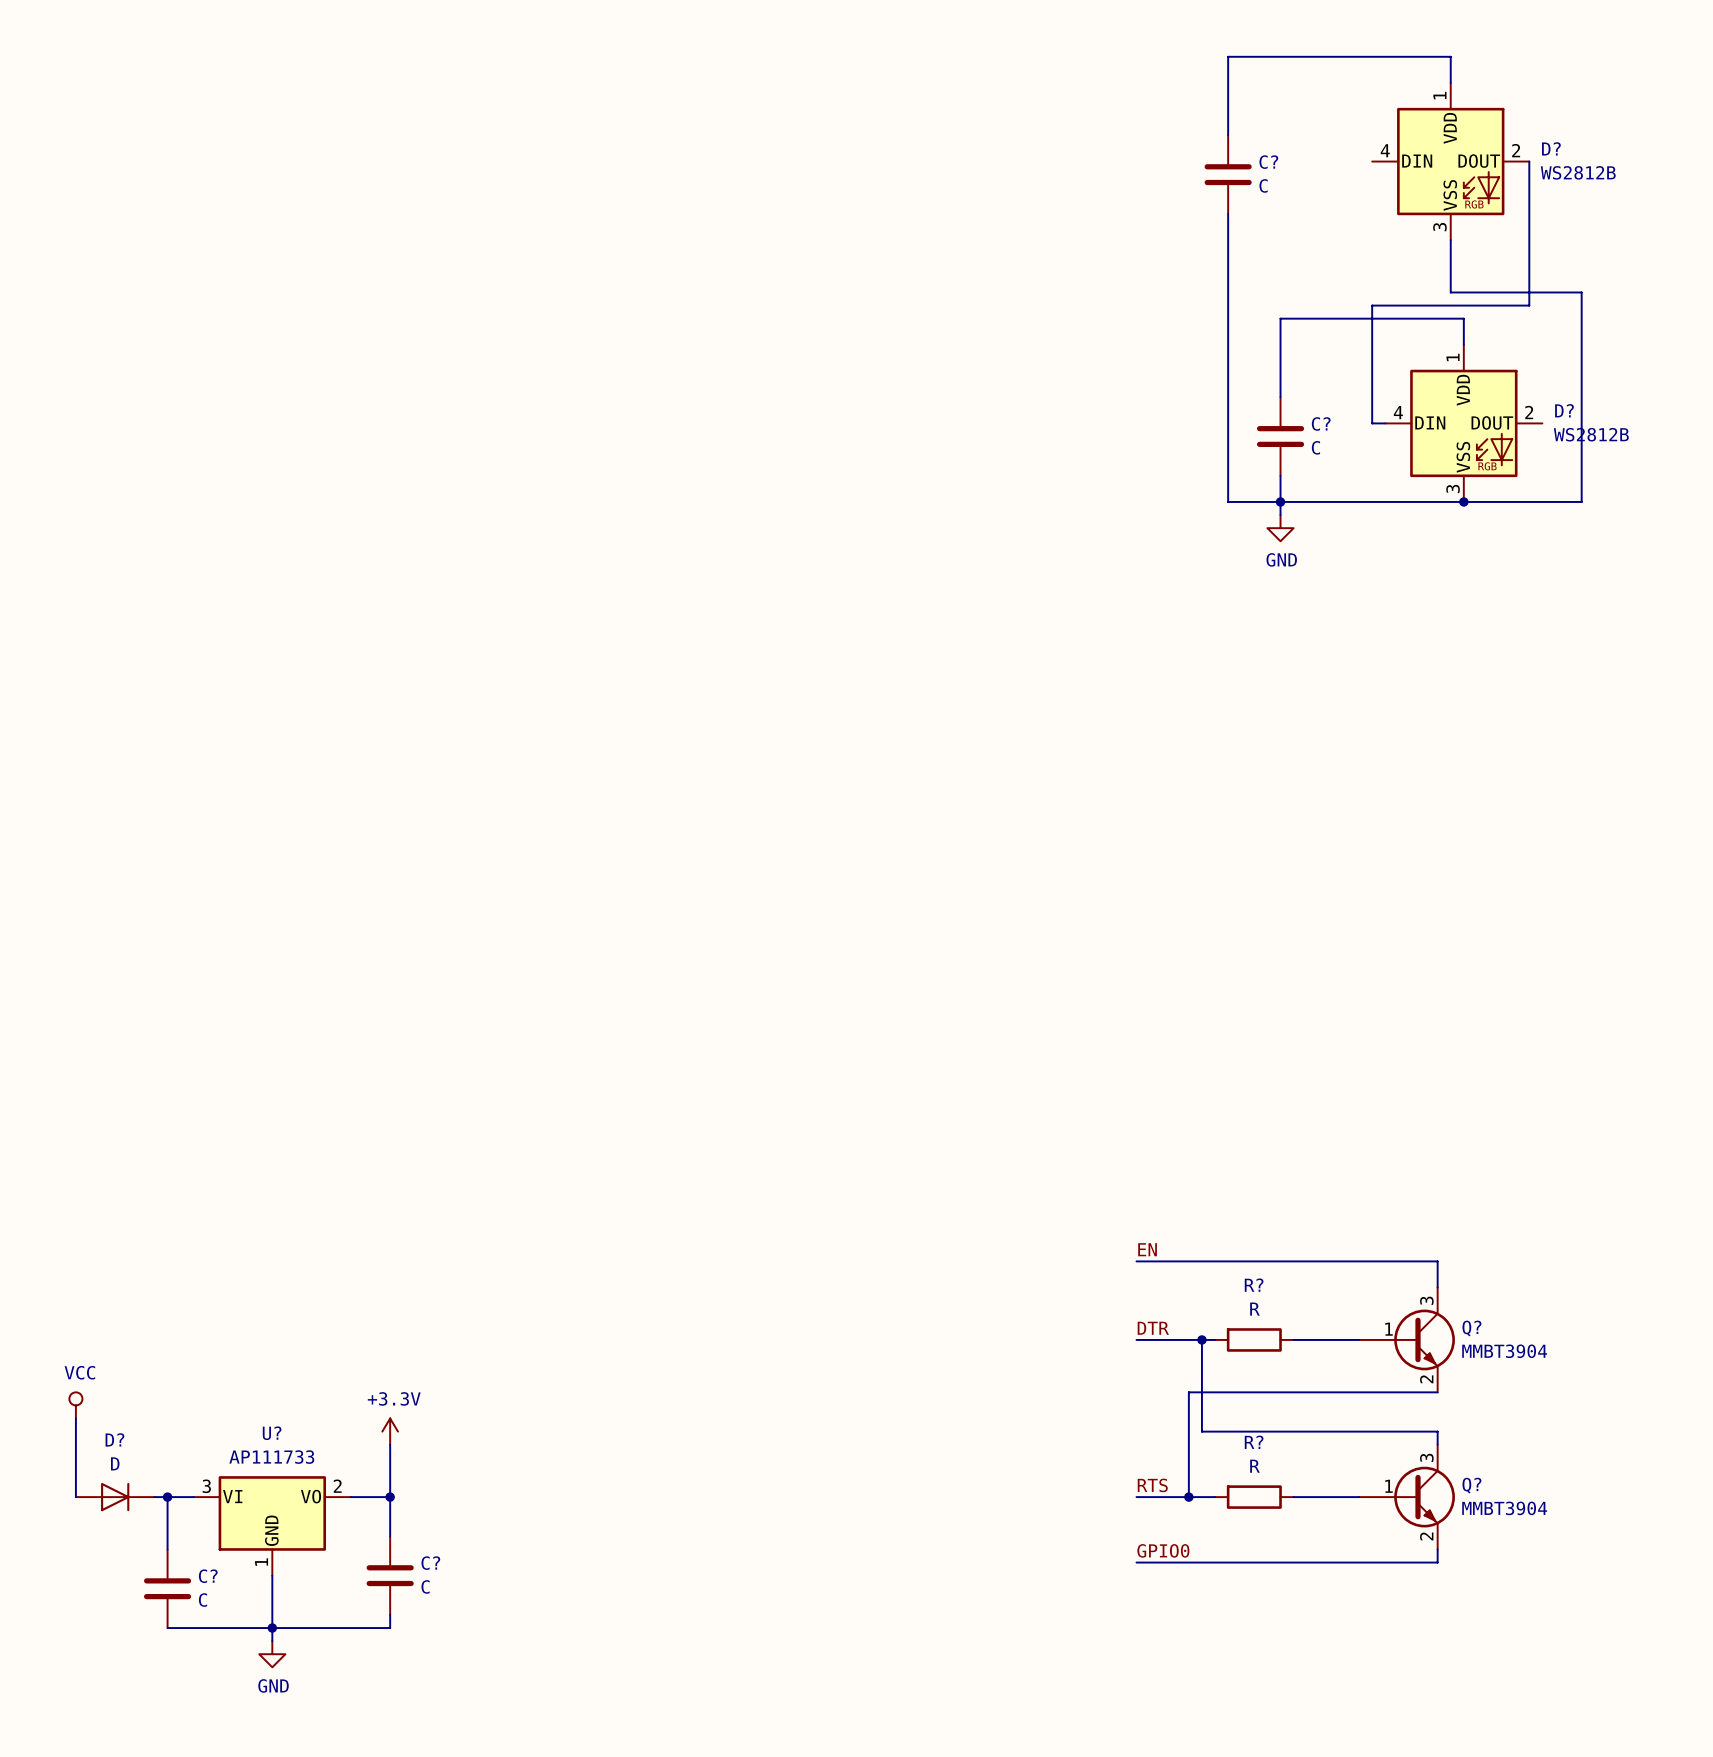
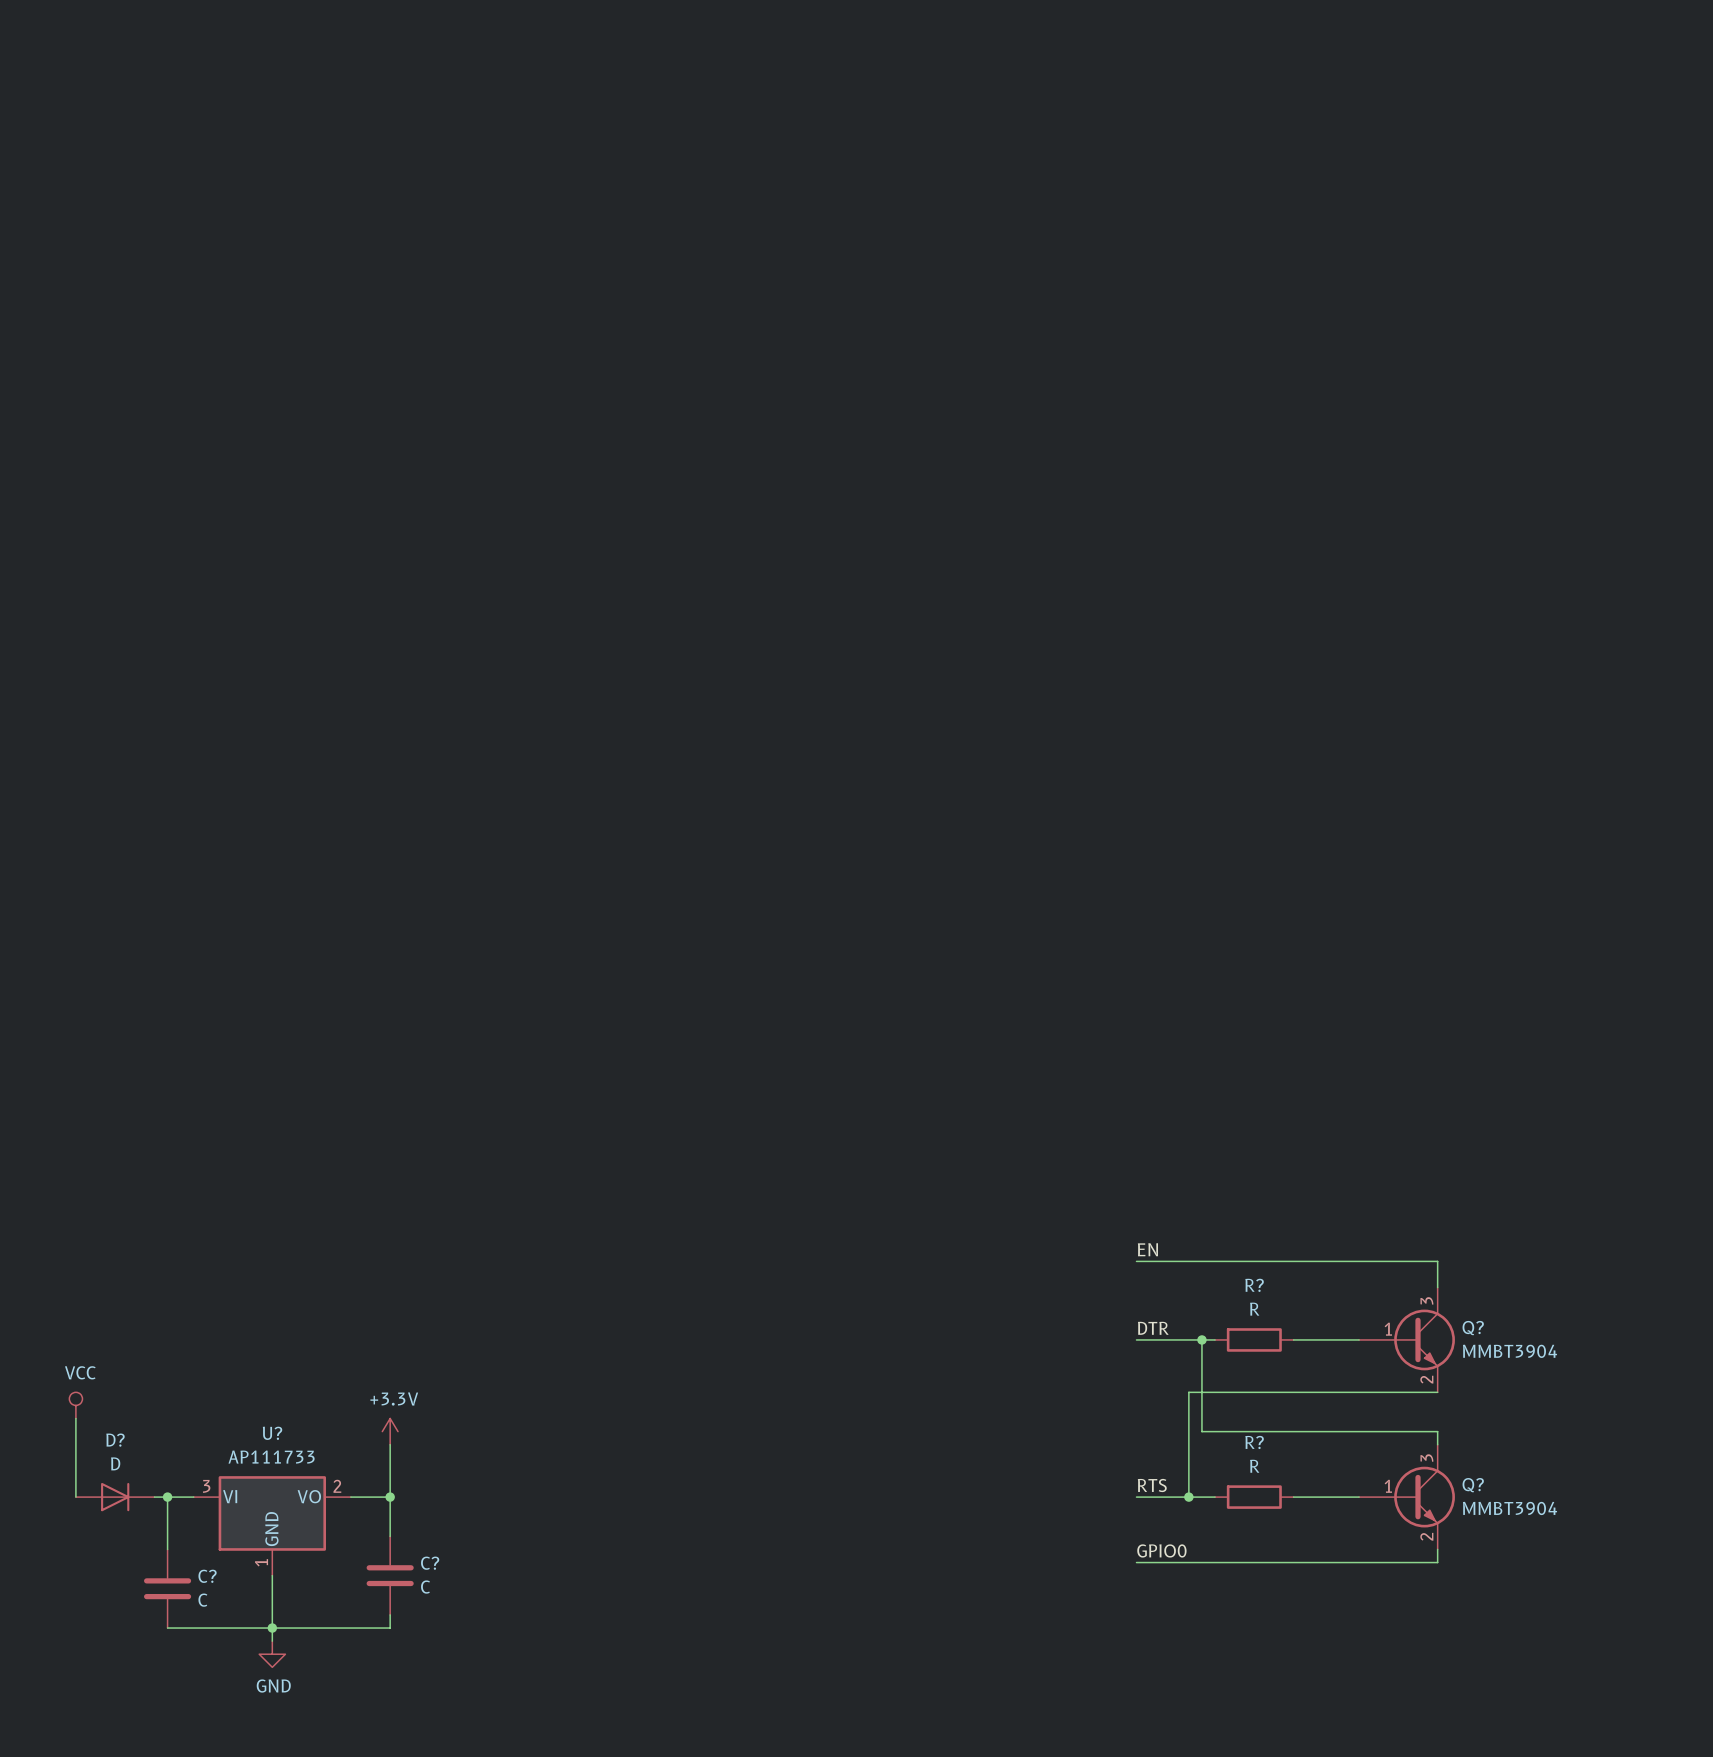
wire: (1450, 82) (1450, 56) (1228, 56) (1228, 135) -> none
D?: WS2812B (1450, 161) -> none
wire: (1529, 161) (1529, 305) (1372, 305) (1372, 423) (1385, 423) -> none
C?: C (1228, 174) -> none
wire: (1228, 213) (1228, 501) (1581, 501) (1581, 292) (1450, 292) (1450, 240) -> none
wire: (1463, 344) (1463, 318) (1280, 318) (1280, 397) -> none
D?: WS2812B (1463, 423) -> none
C?: C (1280, 436) -> none
wire: (1280, 475) (1280, 515) -> none
junction: (1280, 501) -> none
junction: (1463, 501) -> none
power symbol: GND (1280, 528) -> none

